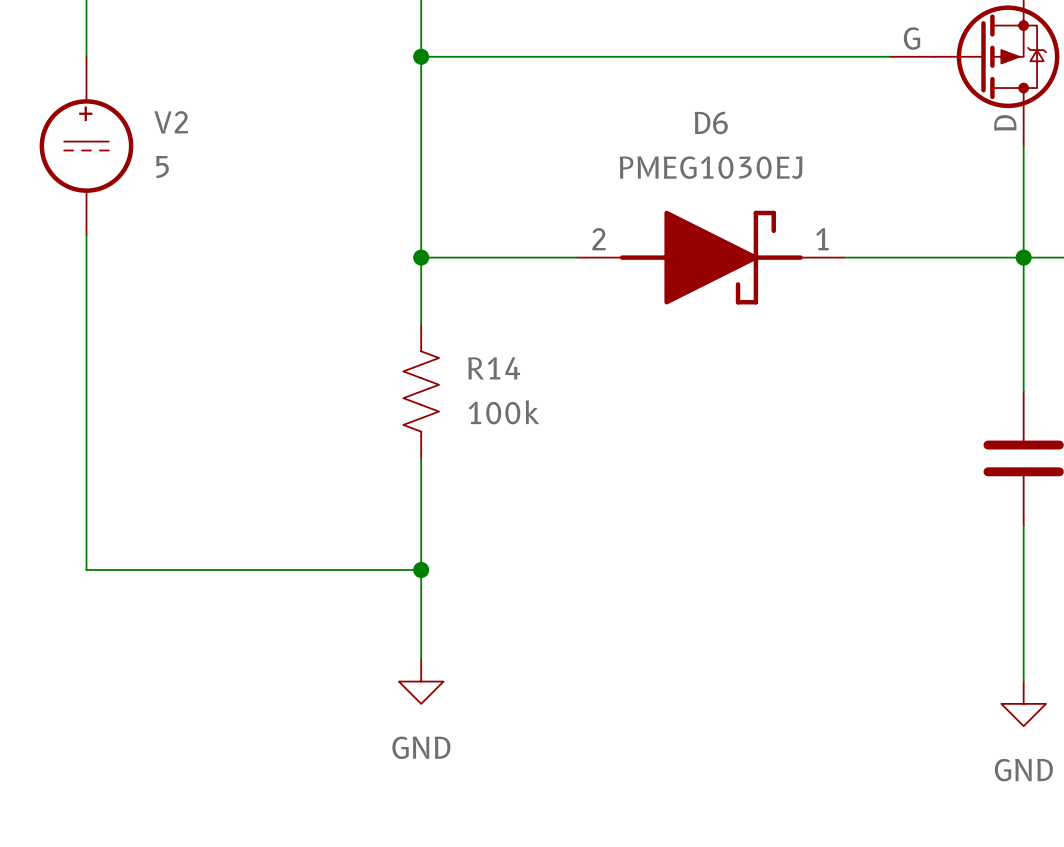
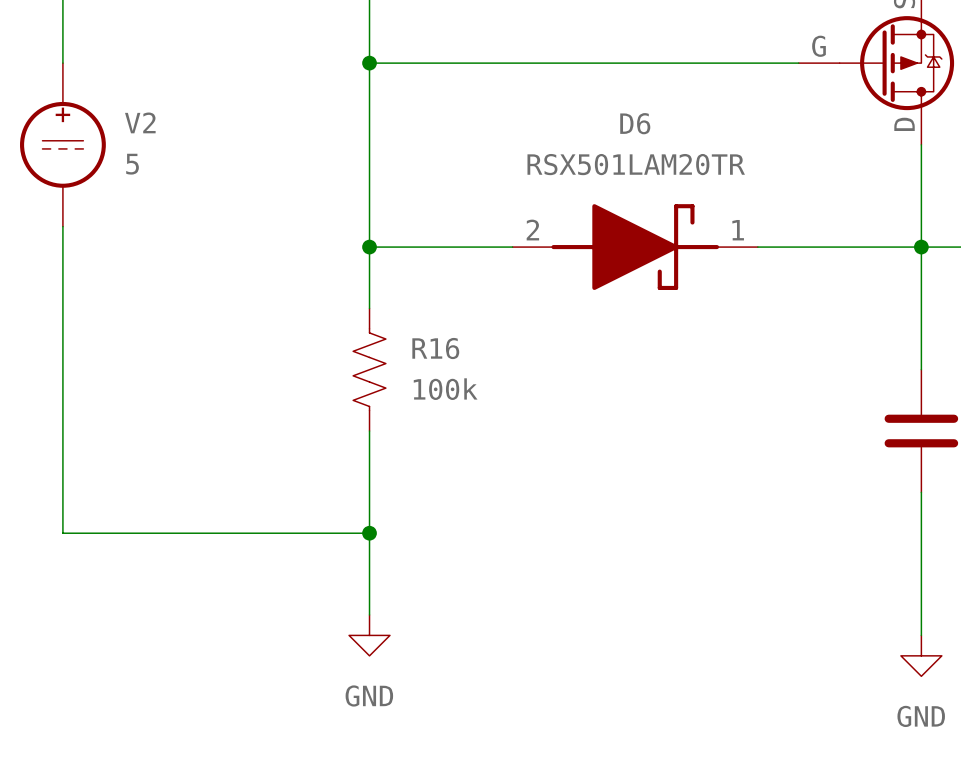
D6 value: PMEG1030EJ (710, 167) -> RSX501LAM20TR (636, 164)
R14 name: R14 (494, 368) -> R16 (435, 348)

